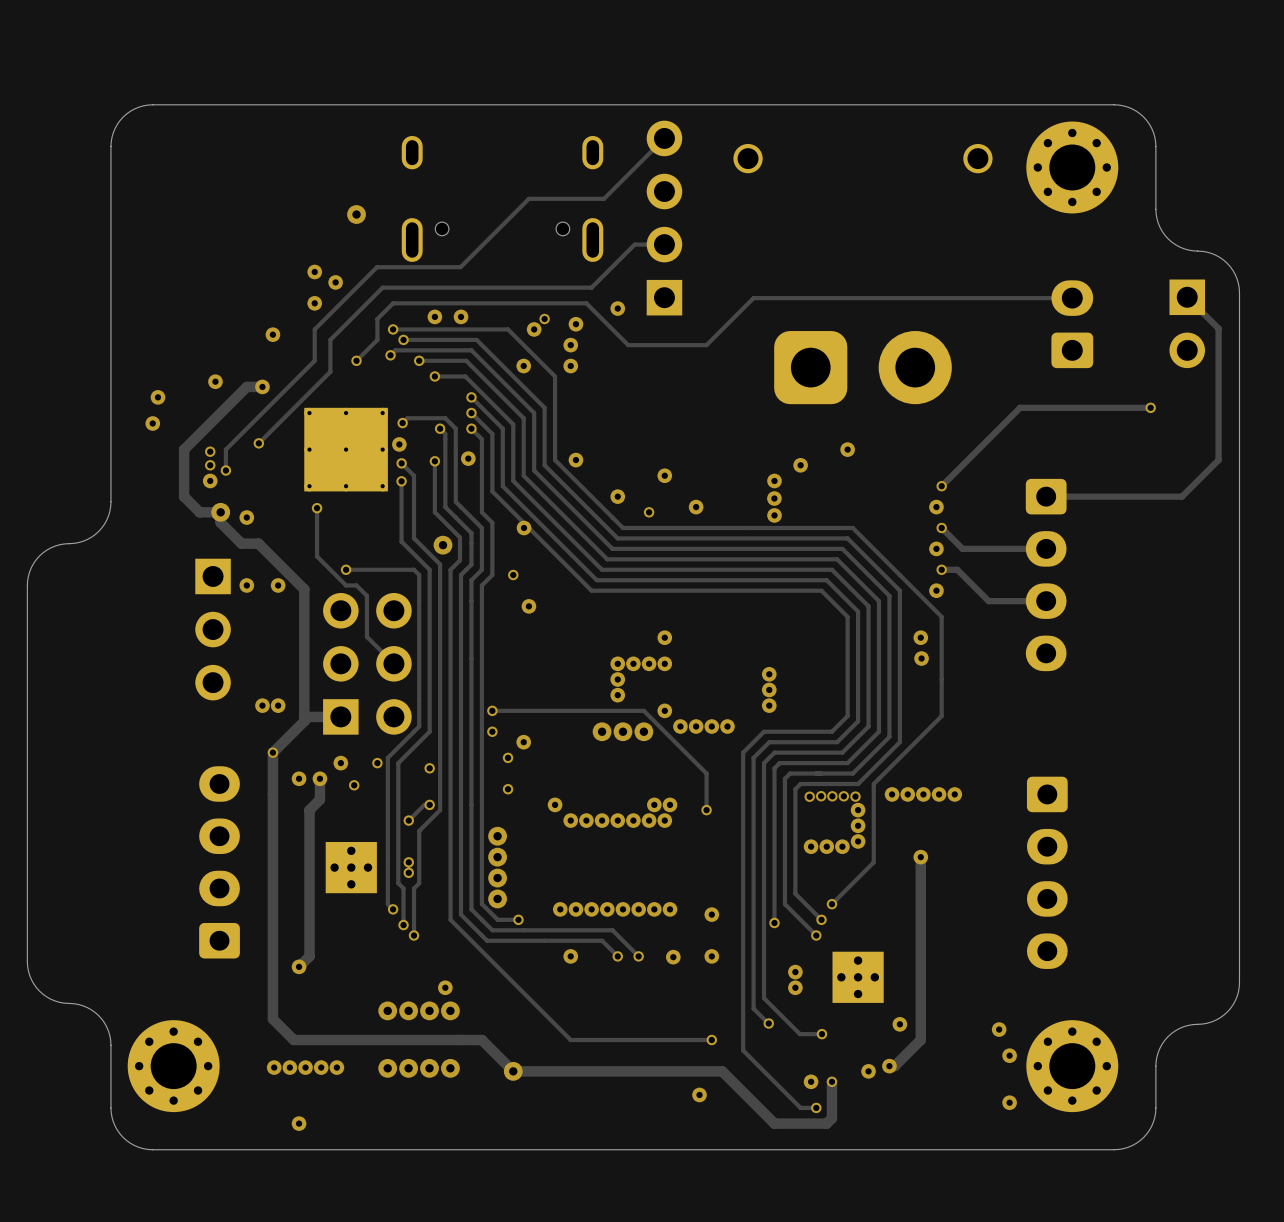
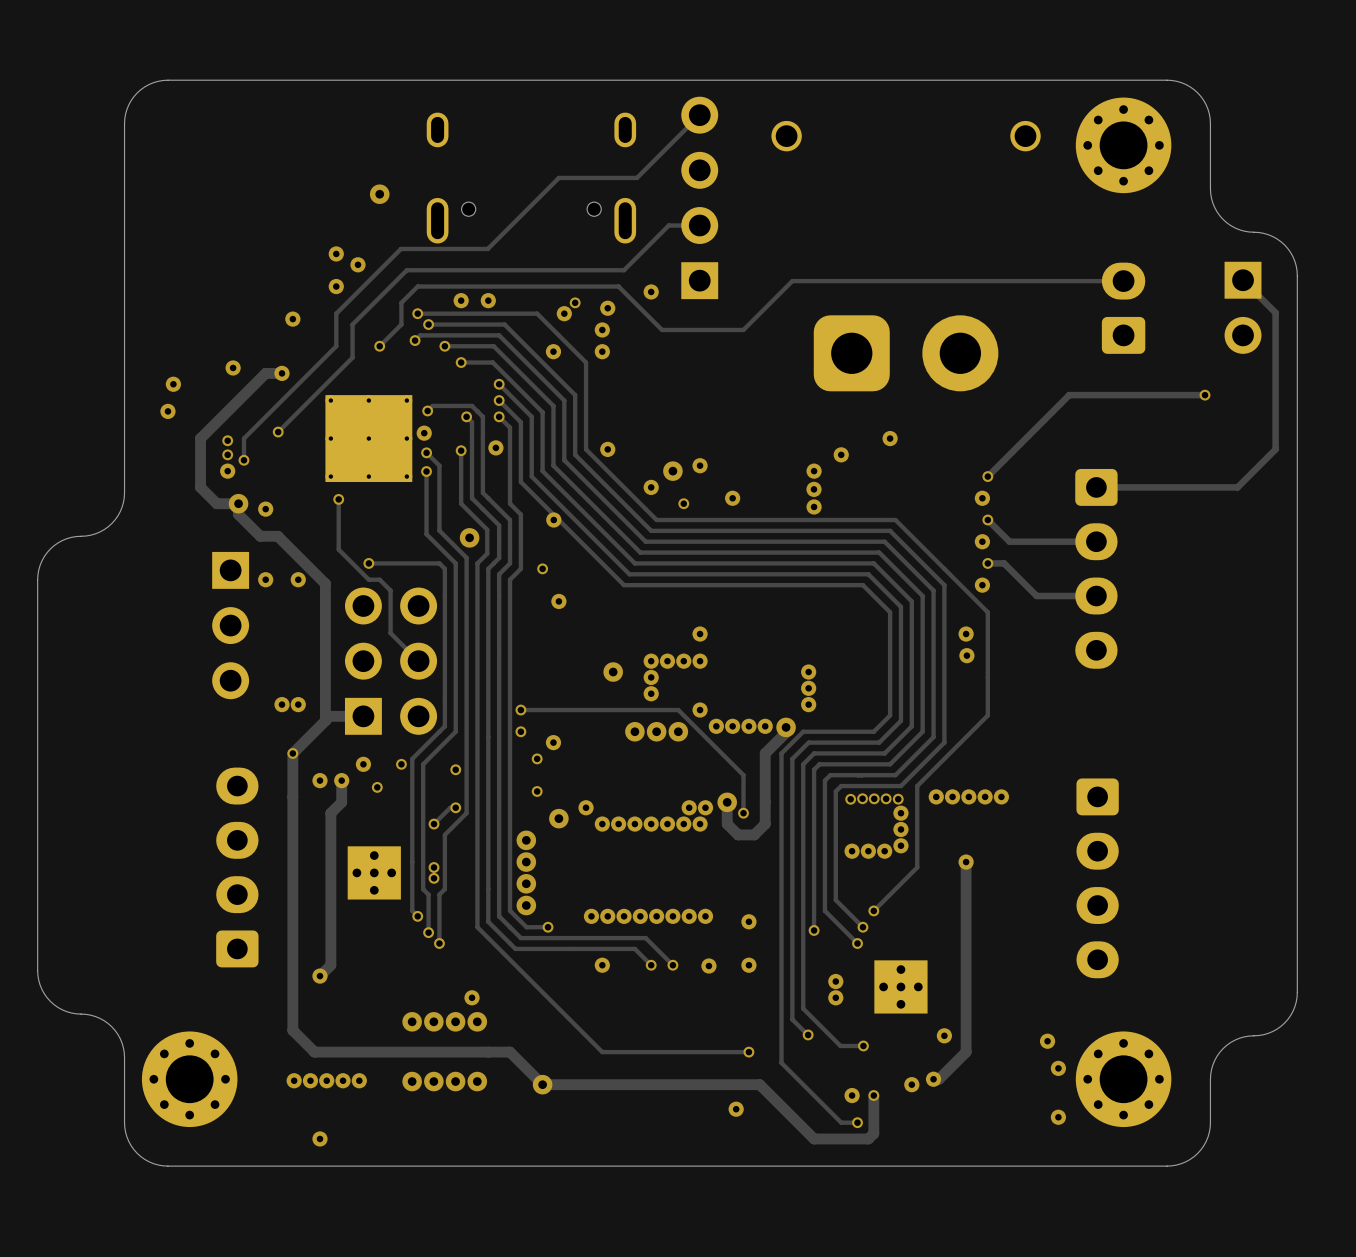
via: none -> (672, 471)
via: none -> (613, 672)
track: none -> (786, 727) (786, 732) (765, 753) (765, 824) (754, 834) (738, 834) (727, 824) (727, 802)
via: none -> (786, 727)
via: none -> (727, 802)
via: none -> (558, 818)

